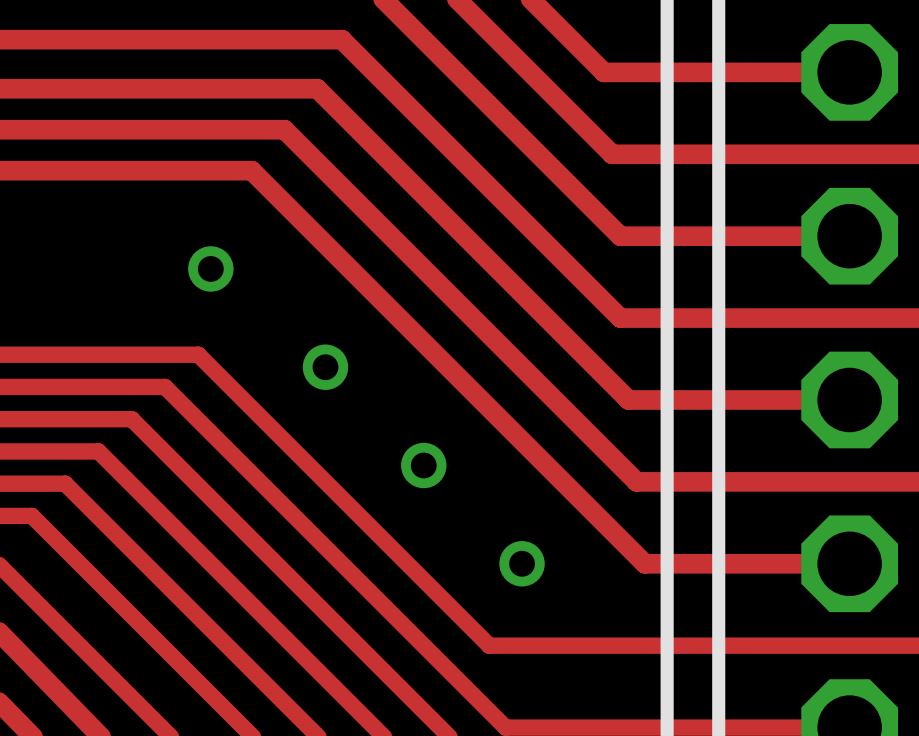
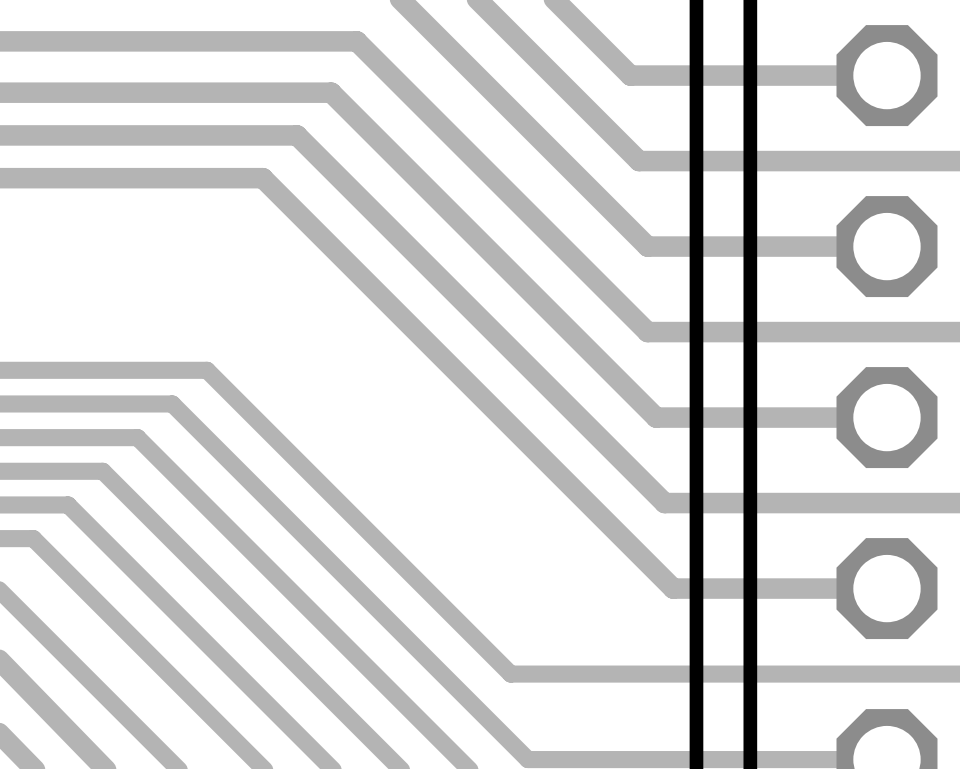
via: (210, 268) -> none
via: (325, 367) -> none
via: (423, 465) -> none
via: (522, 563) -> none

